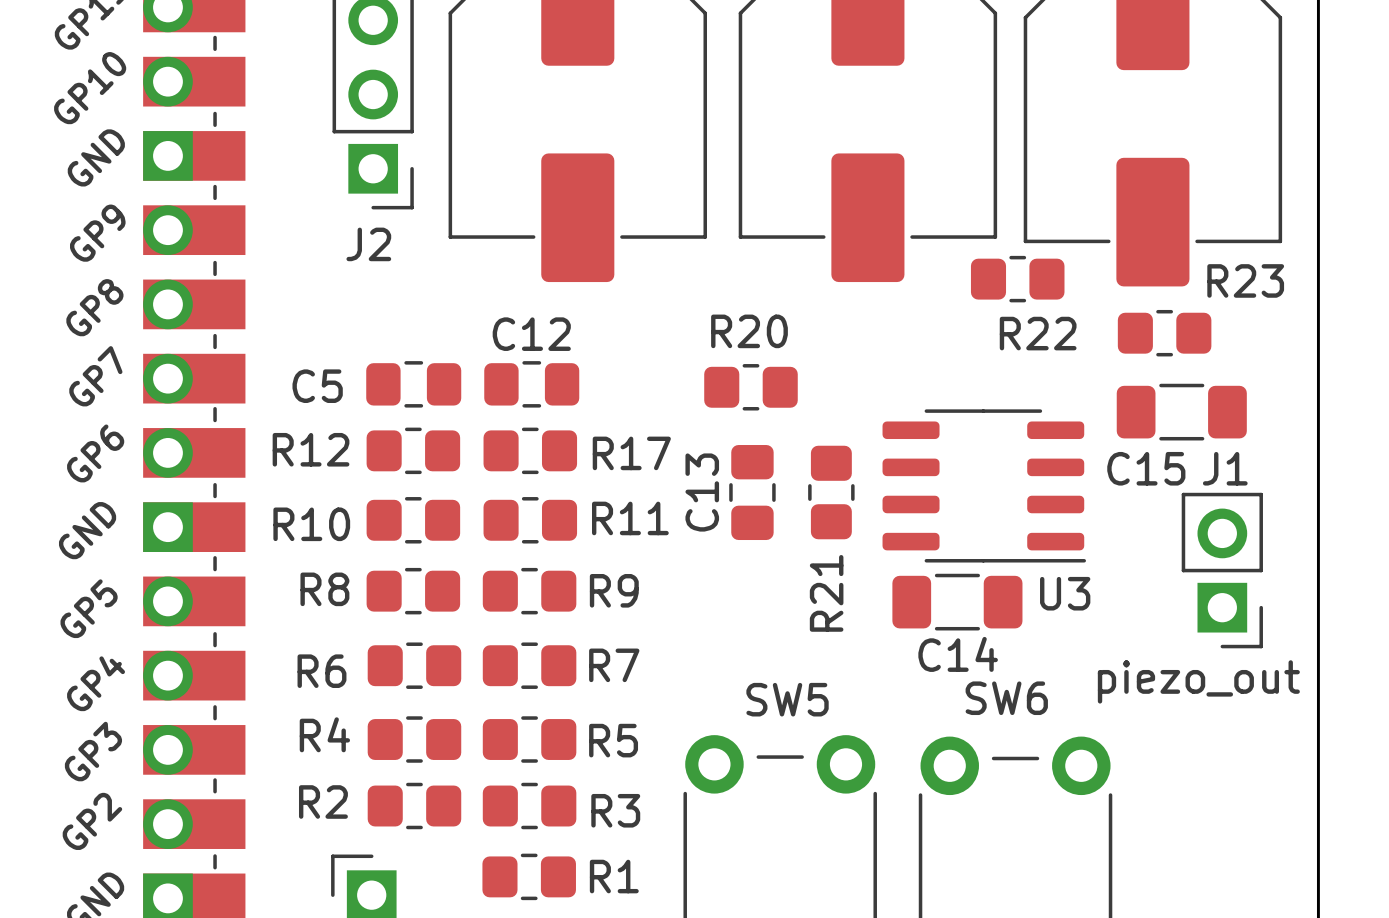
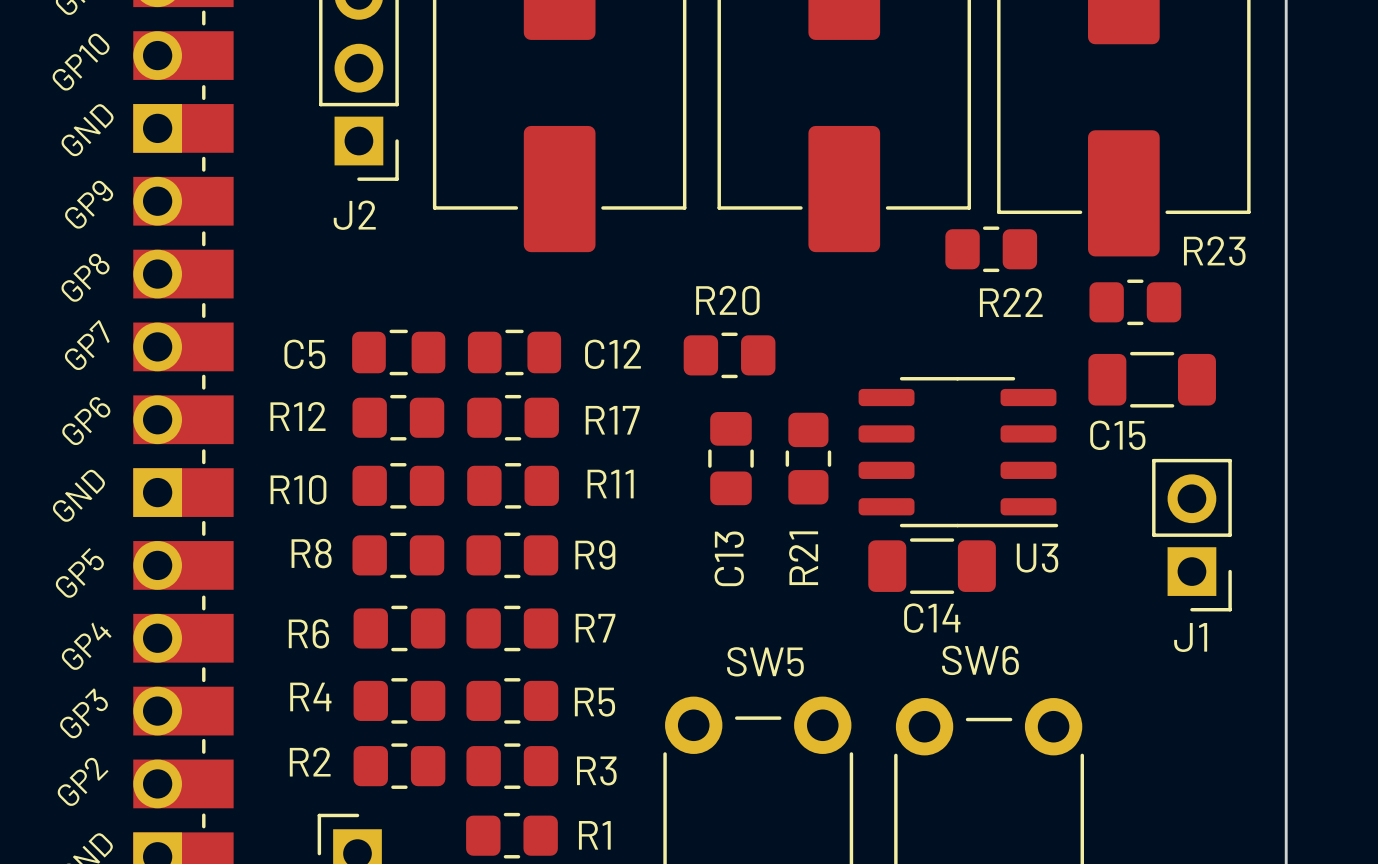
C12 name position: C12 (531, 334) -> C12 (612, 354)
J1 name position: J1 (1225, 468) -> J1 (1190, 637)
C13 name position: C13 (702, 492) -> C13 (729, 558)
text: piezo_out (1198, 681) -> none

